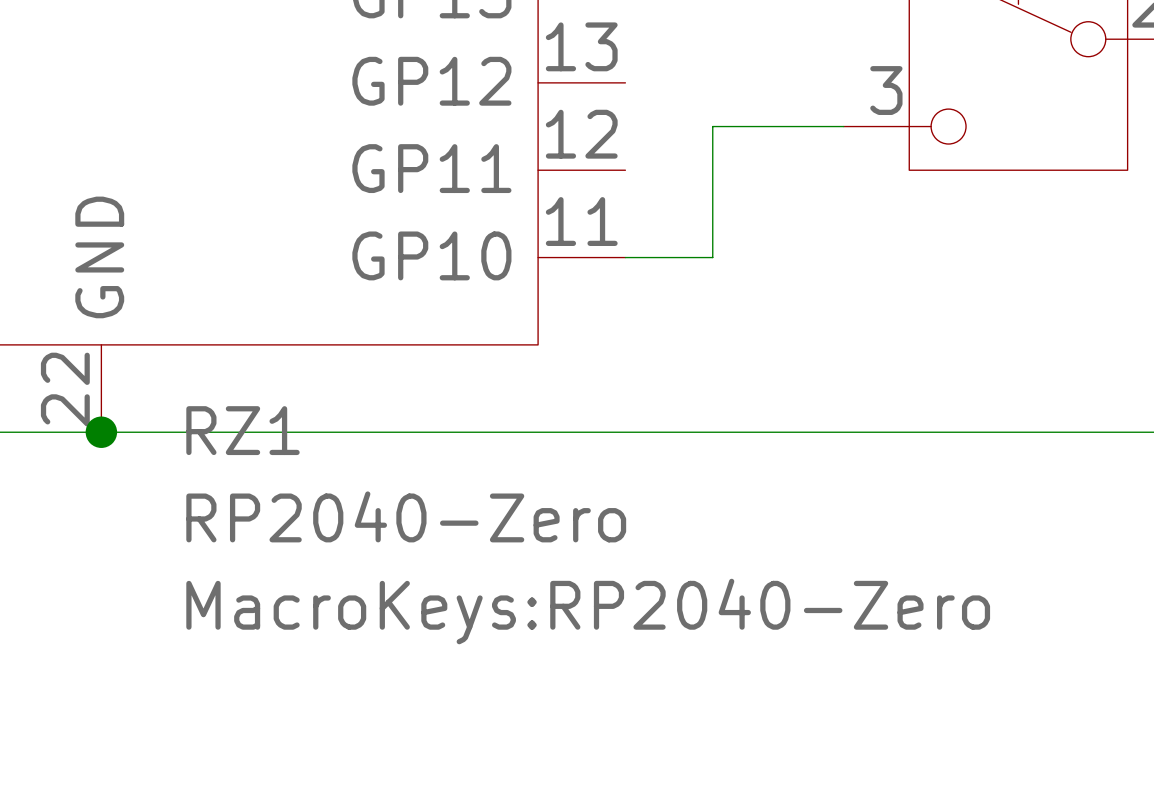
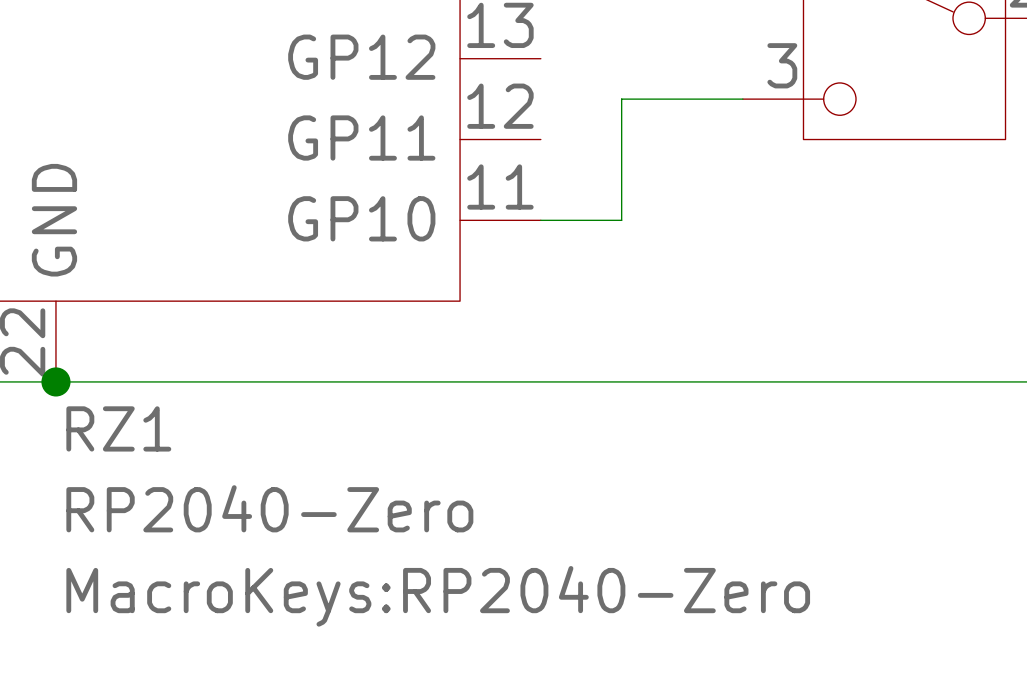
RZ1 name position: RZ1 (242, 430) -> RZ1 (118, 428)
RZ1 value position: RP2040-Zero (406, 516) -> RP2040-Zero (269, 508)
RZ1 text position: MacroKeys:RP2040-Zero (588, 611) -> MacroKeys:RP2040-Zero (438, 596)

